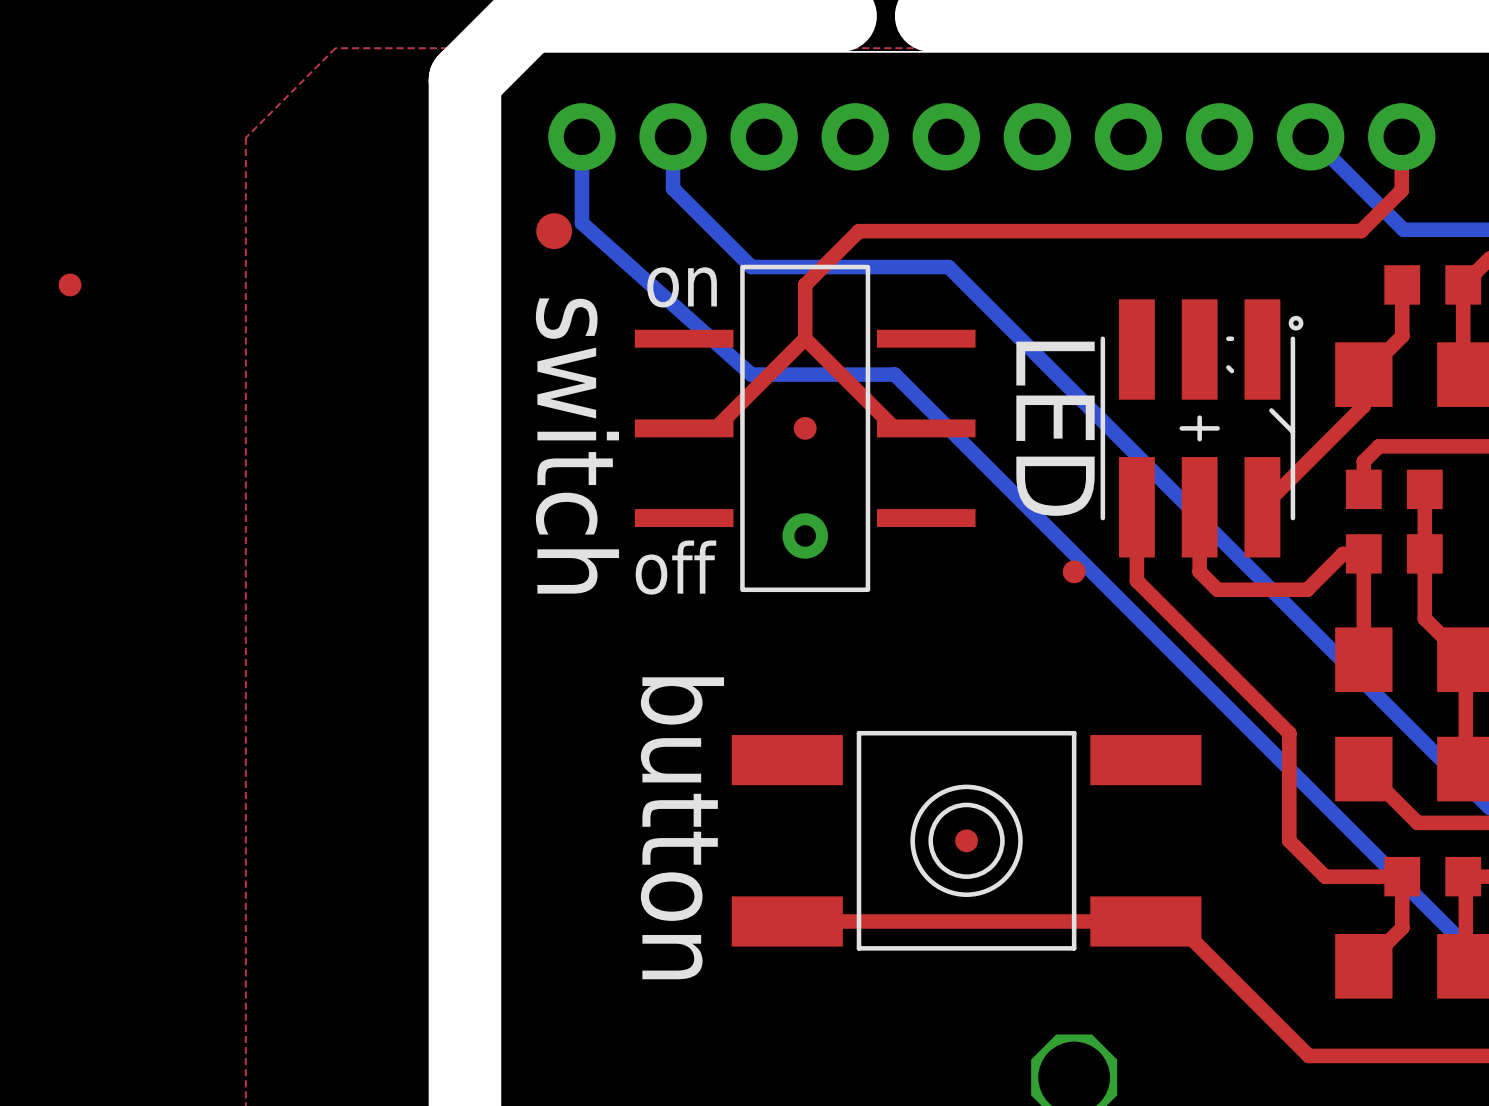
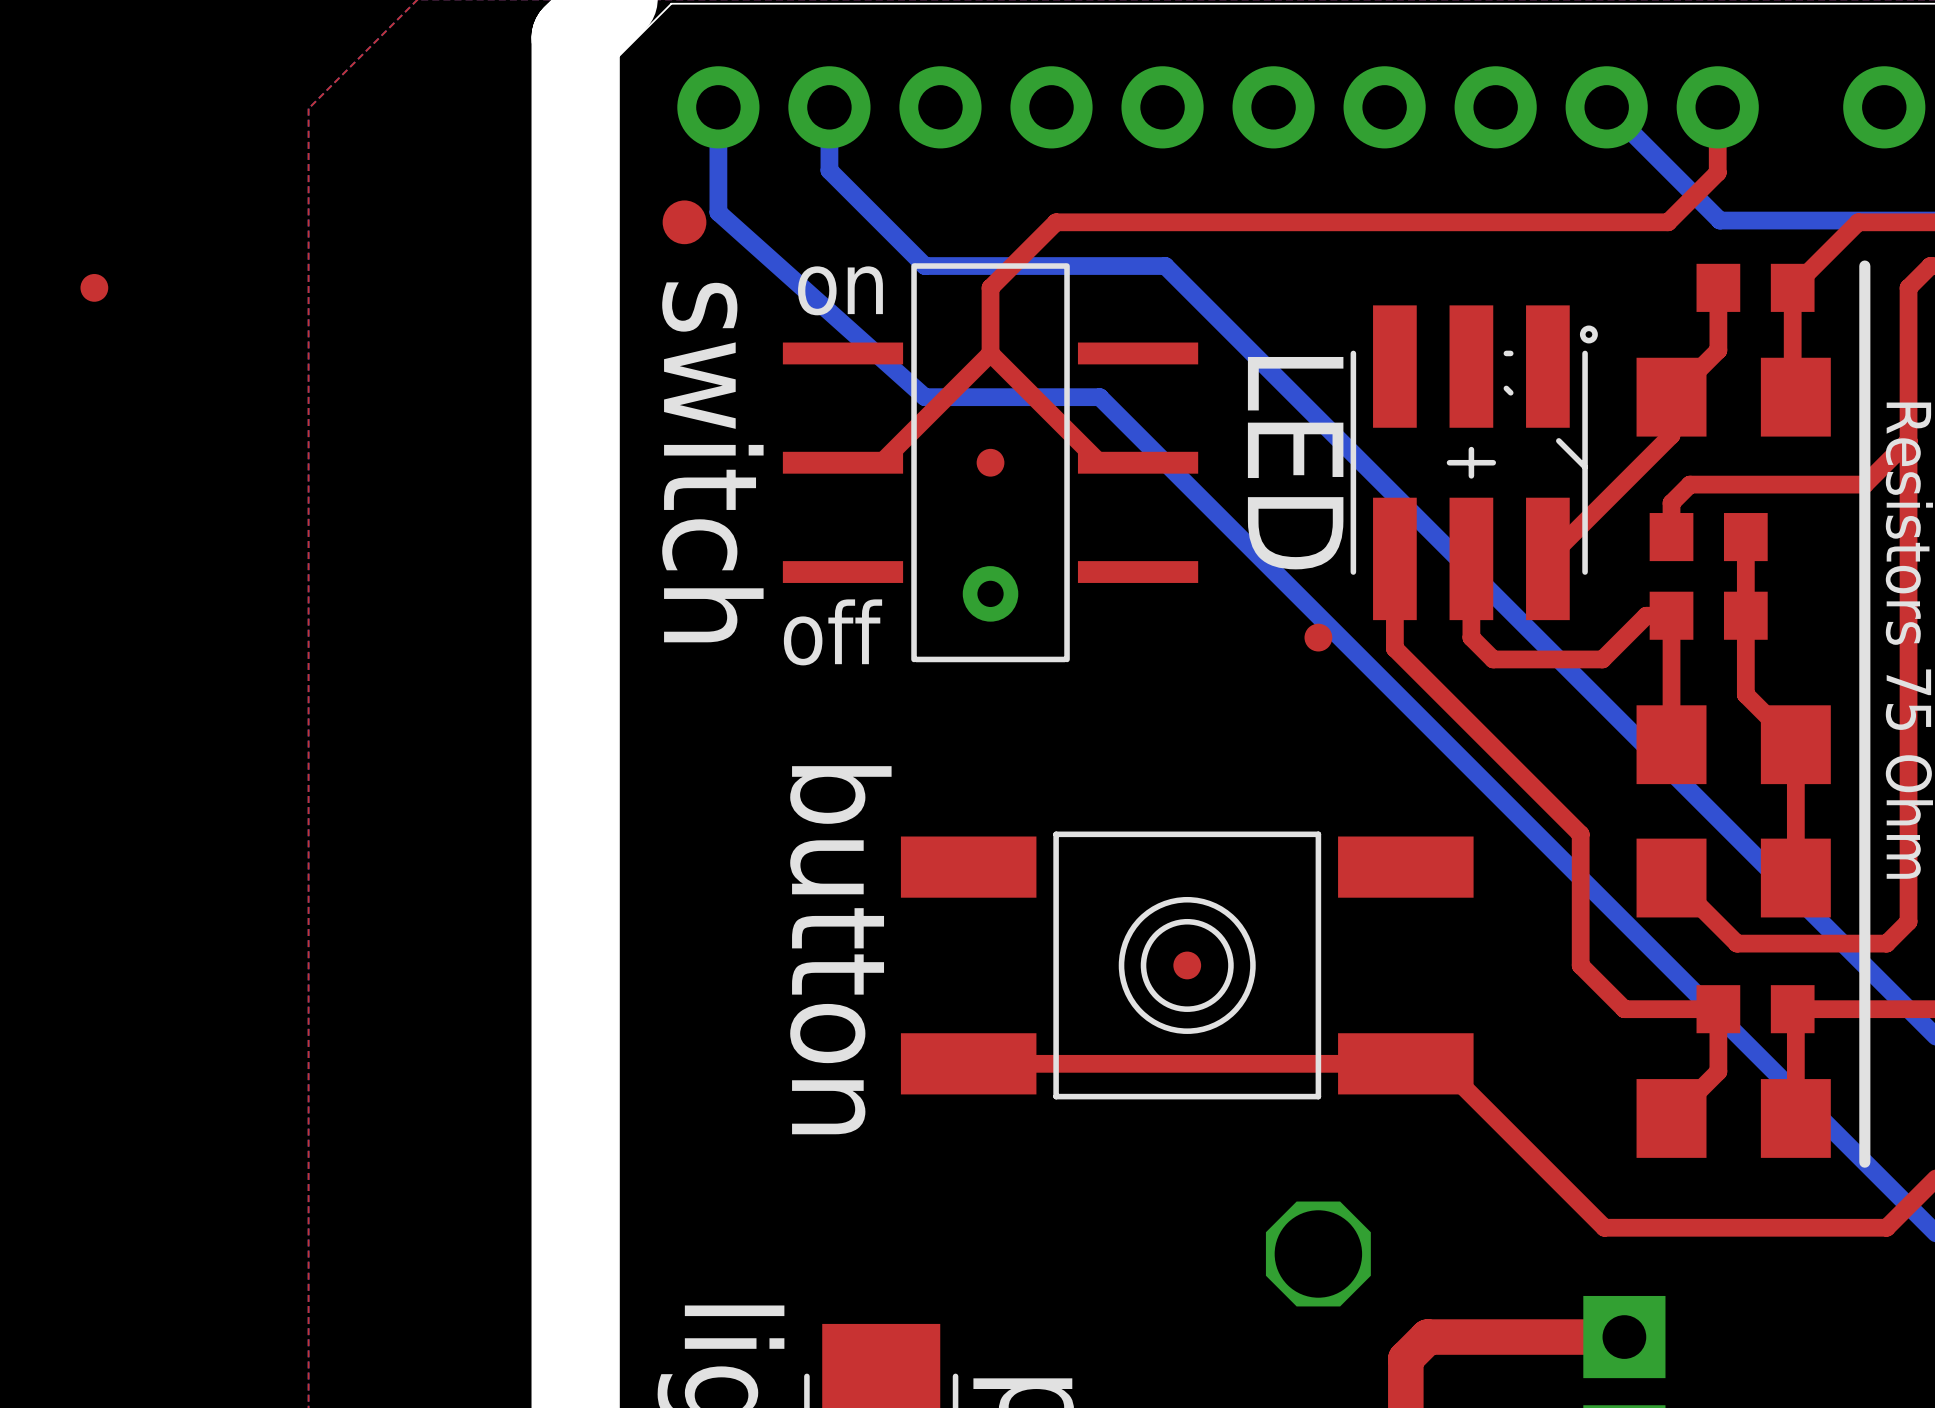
text position: switch (577, 446) -> switch (712, 462)

